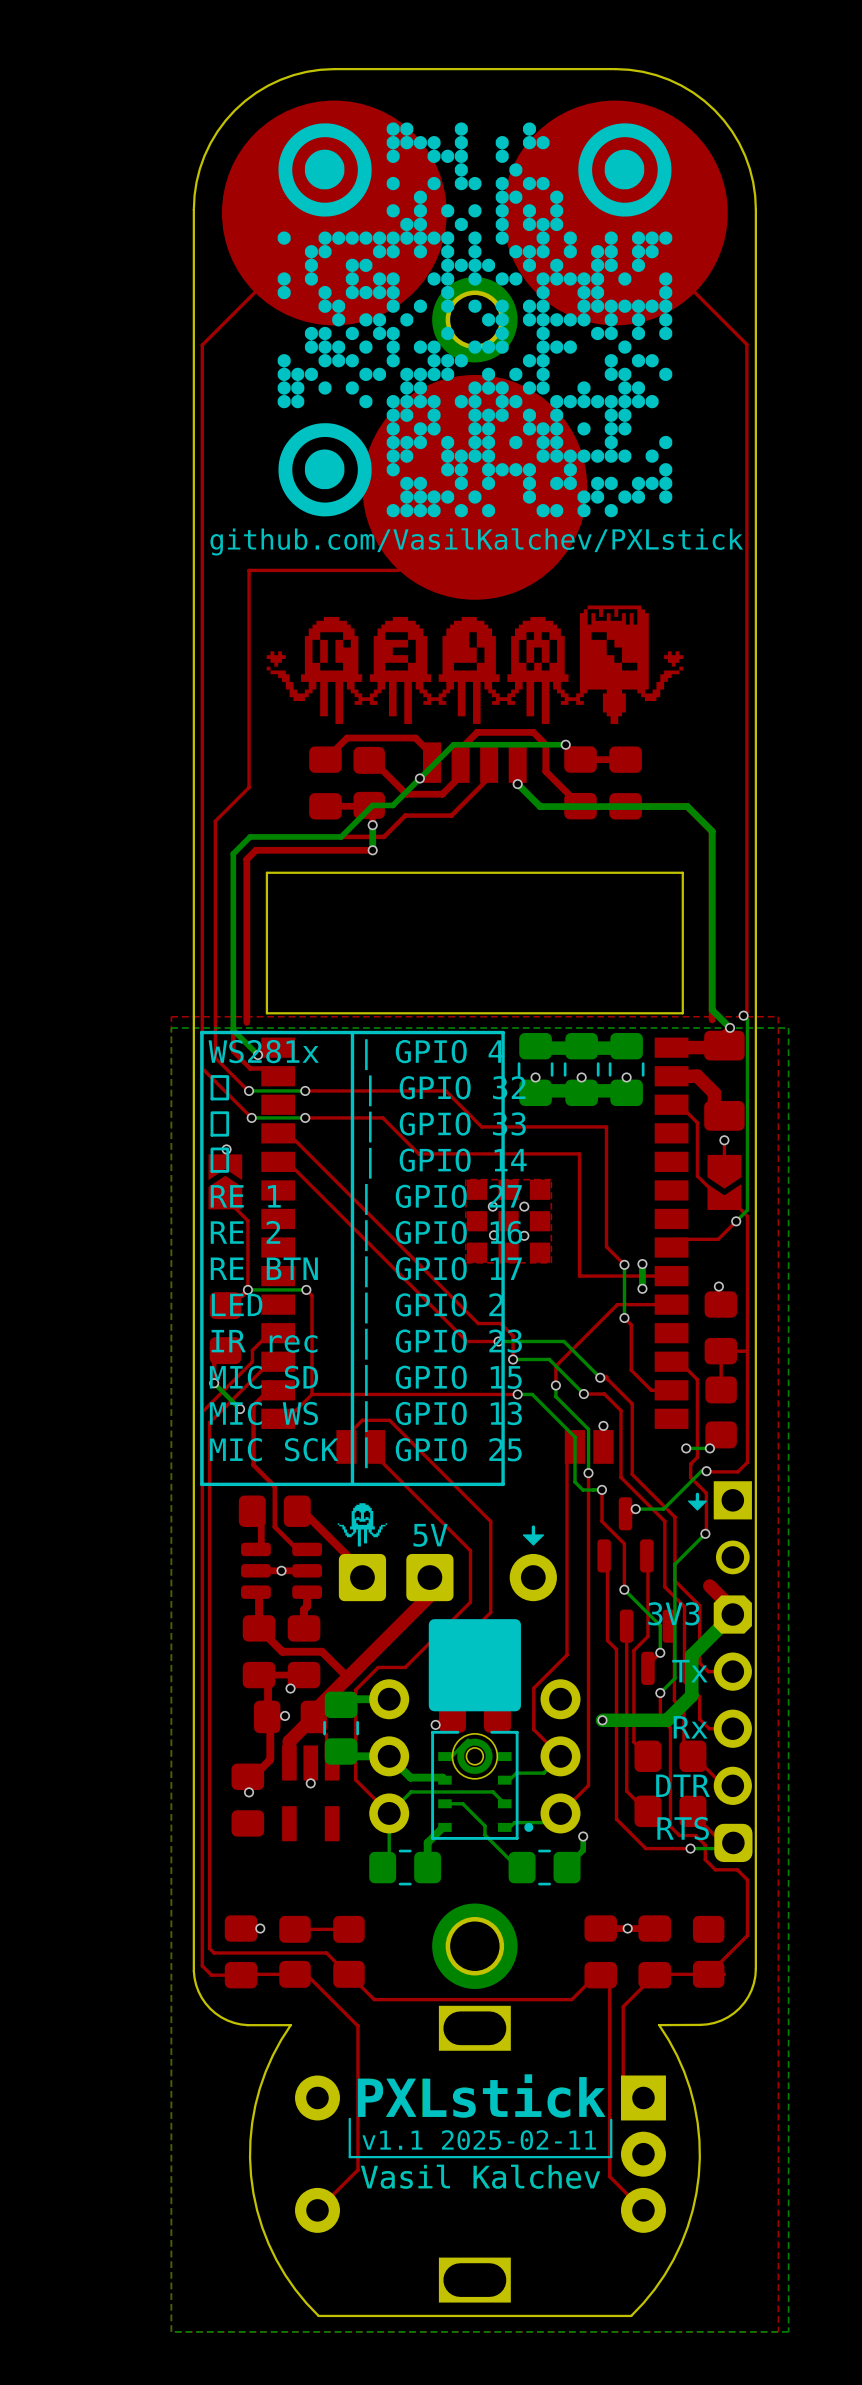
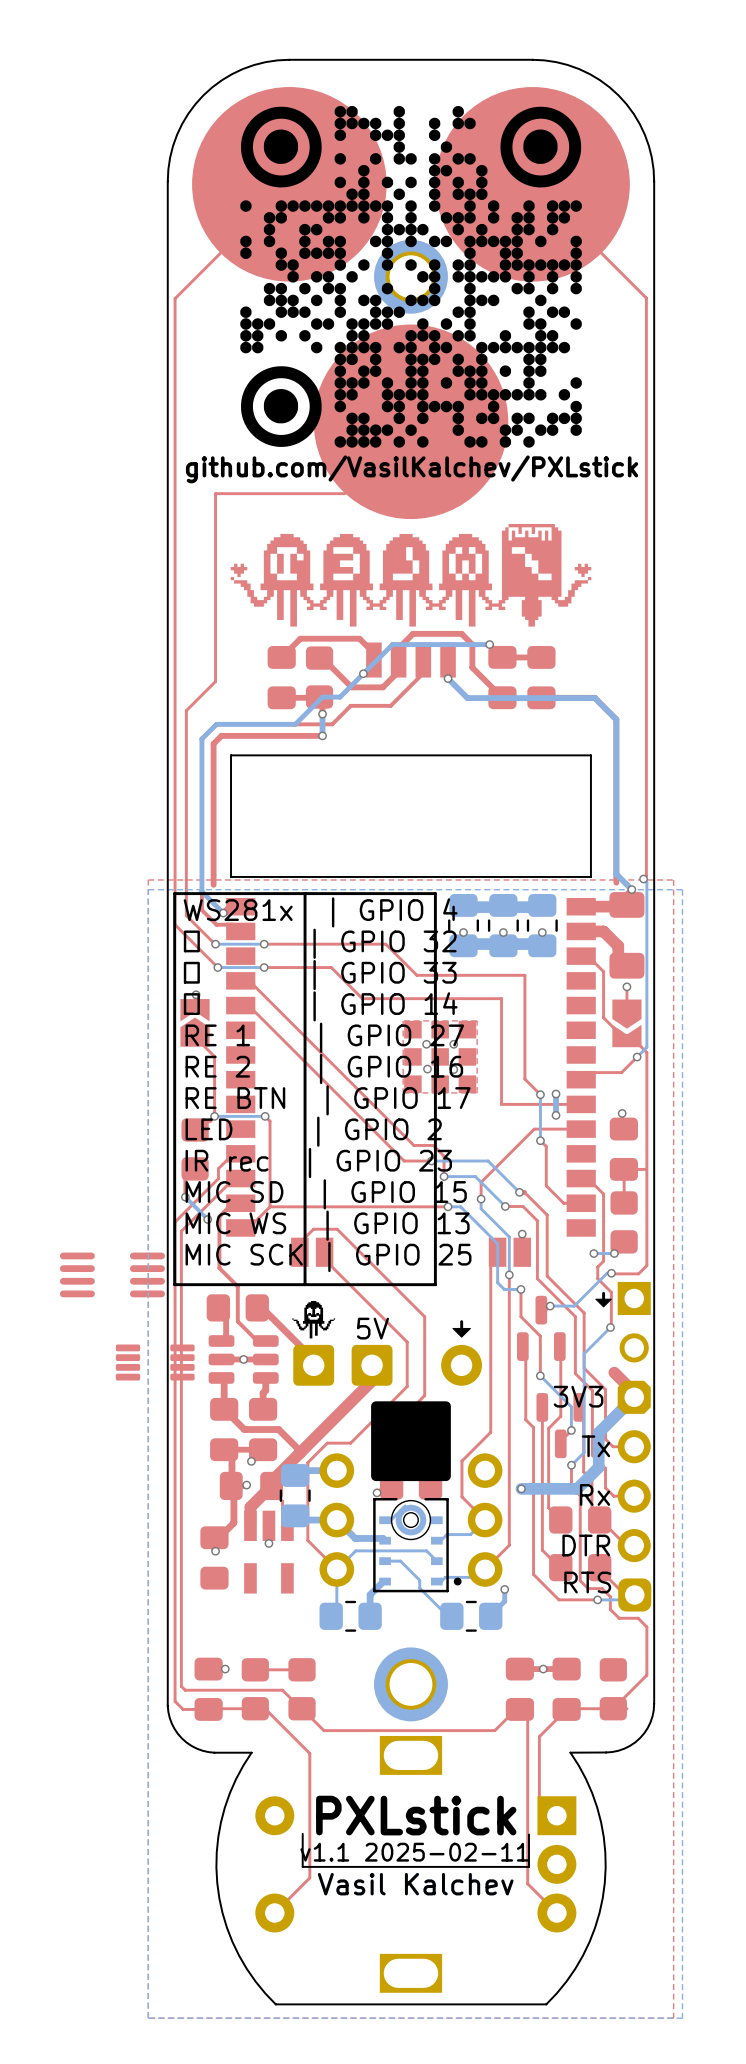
part: none -> (112, 1274)
part: none -> (155, 1362)

